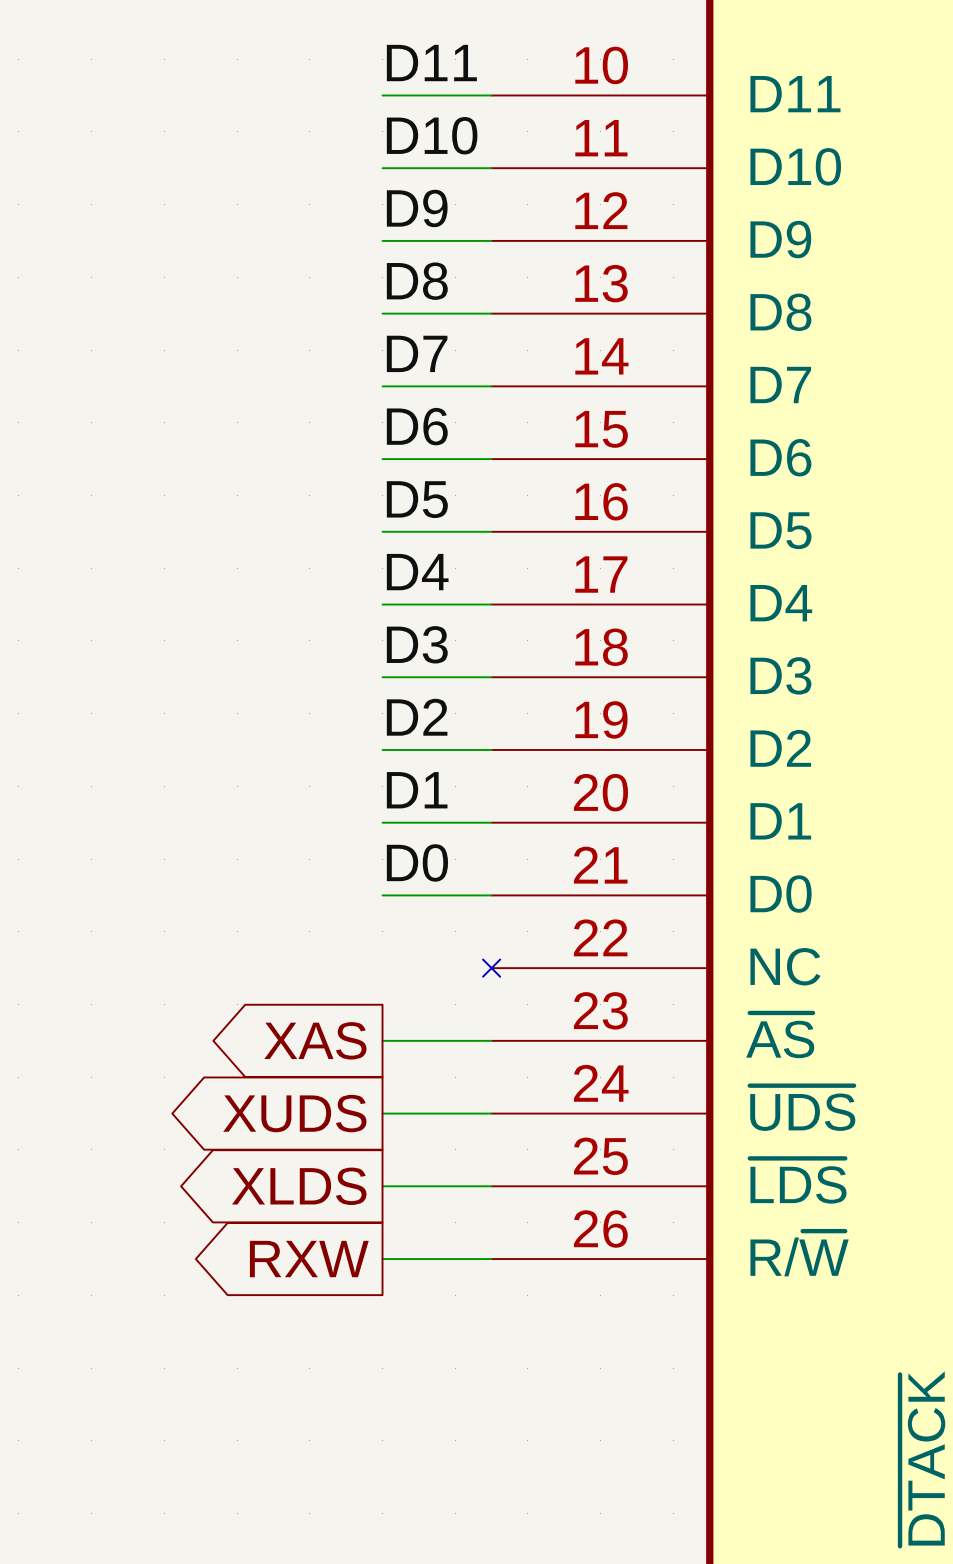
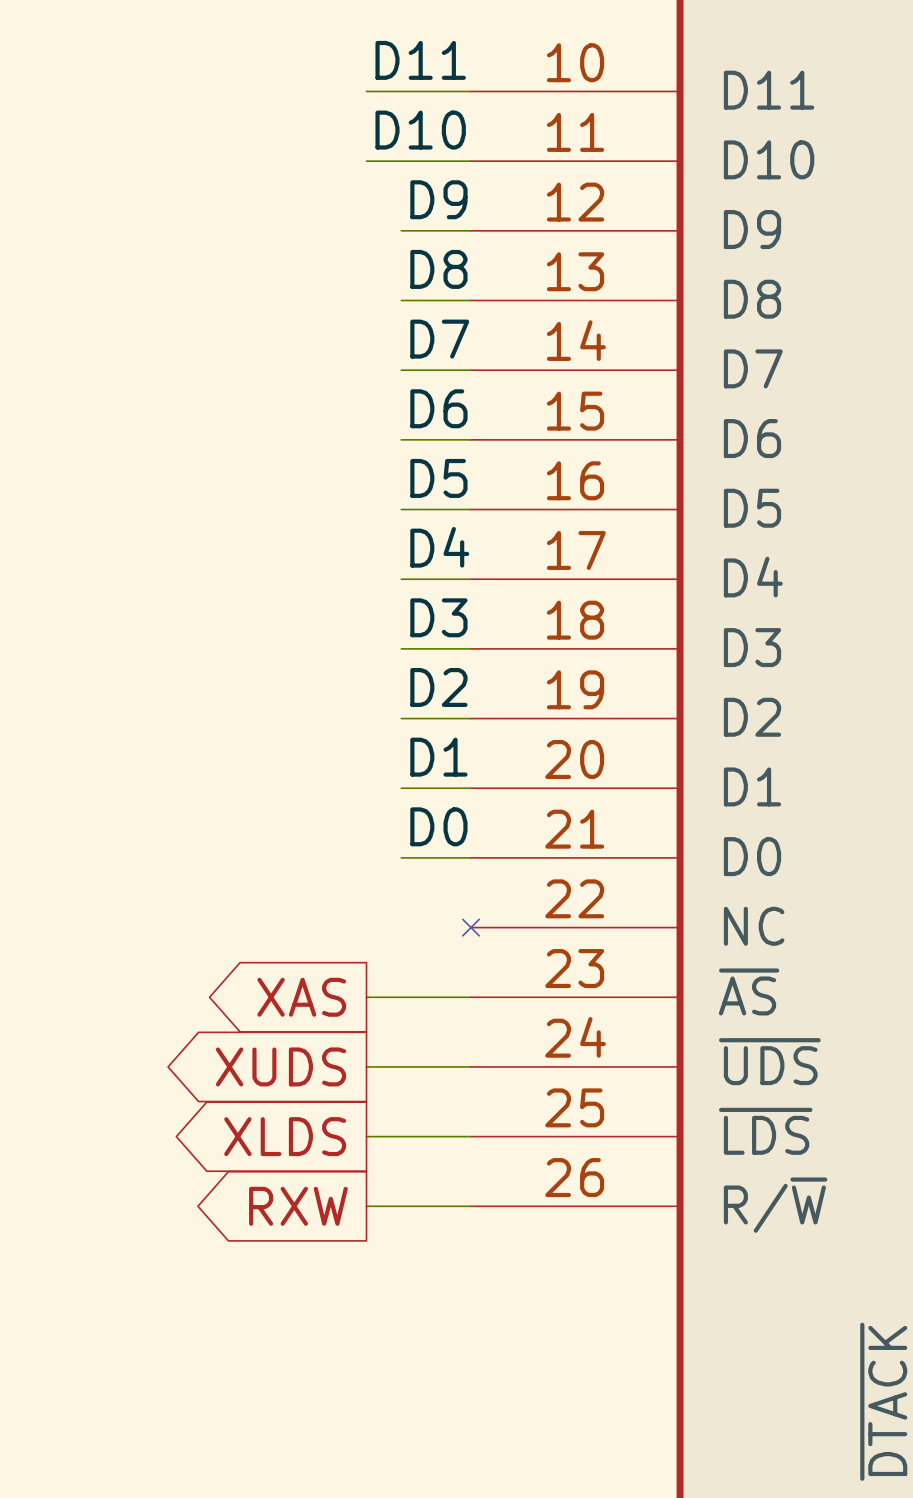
label position: D9 (417, 208) -> D9 (438, 199)
wire: (382, 240) (418, 240) -> none
label position: D8 (417, 281) -> D8 (438, 269)
wire: (382, 313) (418, 313) -> none
label position: D7 (417, 353) -> D7 (439, 339)
wire: (382, 386) (418, 386) -> none
label position: D6 (417, 426) -> D6 (438, 408)
wire: (382, 459) (418, 459) -> none
label position: D5 (417, 499) -> D5 (438, 478)
wire: (382, 531) (418, 531) -> none
label position: D4 (417, 572) -> D4 (439, 547)
wire: (382, 604) (418, 604) -> none
label position: D3 (417, 644) -> D3 (438, 617)
wire: (382, 677) (418, 677) -> none
label position: D2 (417, 717) -> D2 (438, 687)
wire: (382, 749) (418, 749) -> none
label position: D1 (417, 790) -> D1 (438, 757)
wire: (382, 822) (418, 822) -> none
label position: D0 (417, 862) -> D0 (438, 826)
wire: (382, 895) (418, 895) -> none

